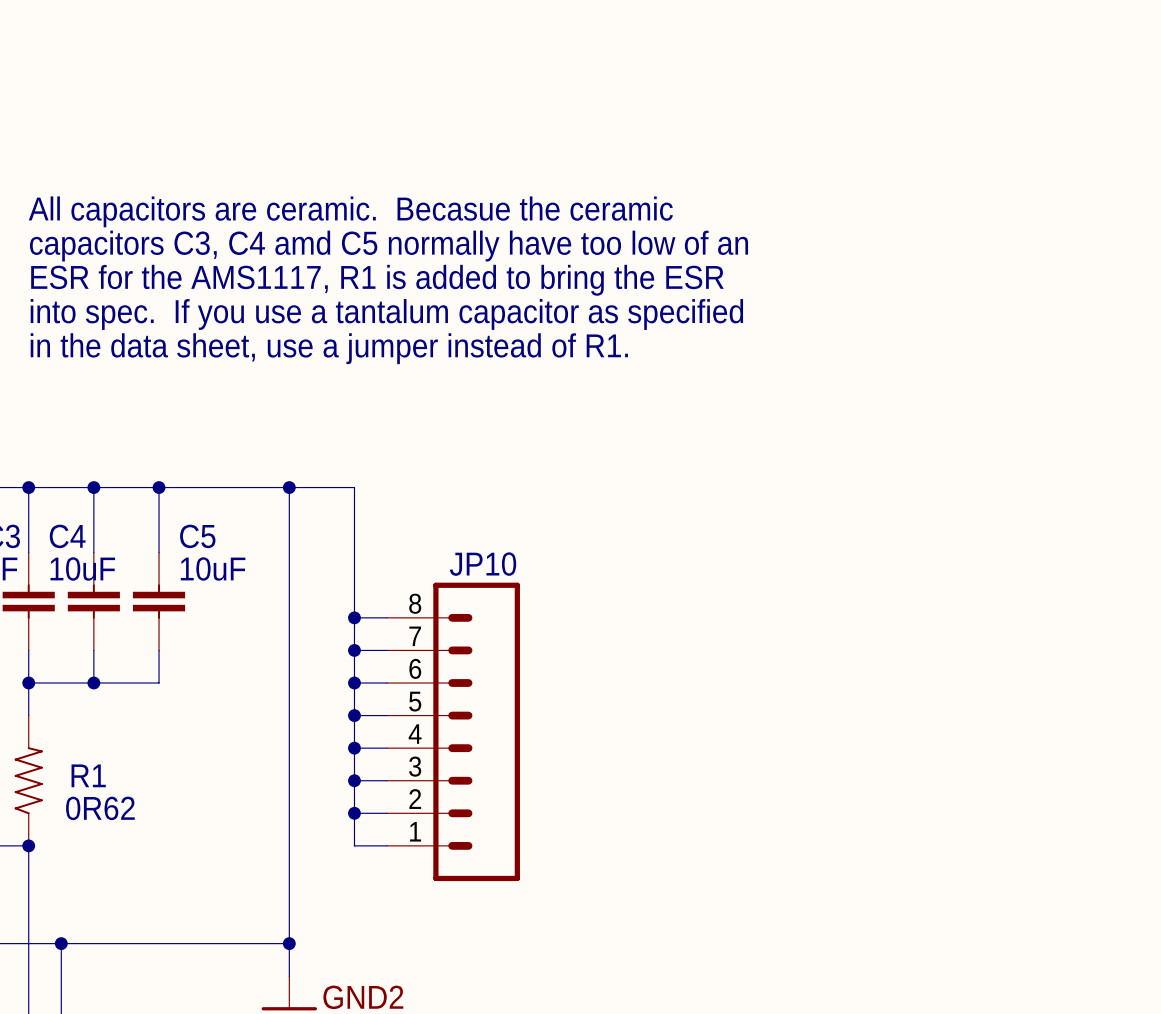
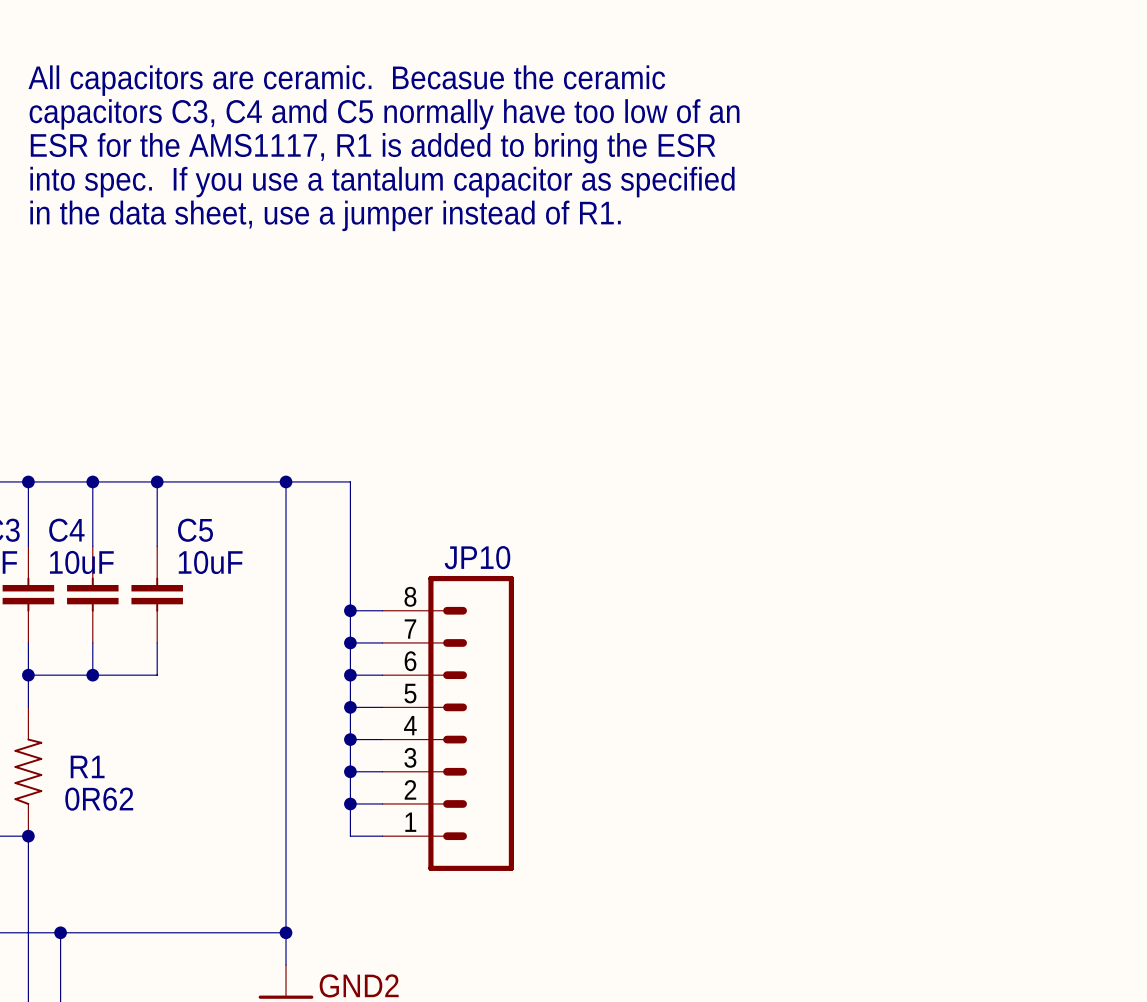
text: none -> All capacitors are ceramic. Becasue the ceramic (346, 80)
text: All capacitors are ceramic. Becasue the ceramic (350, 211) -> in the data sheet, use a jumper instead of R1. (325, 215)
text position: capacitors C3, C4 amd C5 normally have too low of an (389, 246) -> capacitors C3, C4 amd C5 normally have too low of an (384, 114)
text position: ESR for the AMS1117, R1 is added to bring the ESR (377, 280) -> ESR for the AMS1117, R1 is added to bring the ESR (373, 148)
text position: into spec. If you use a tantalum capacitor as specified (386, 314) -> into spec. If you use a tantalum capacitor as specified (382, 182)
text: in the data sheet, use a jumper instead of R1. (329, 348) -> none

